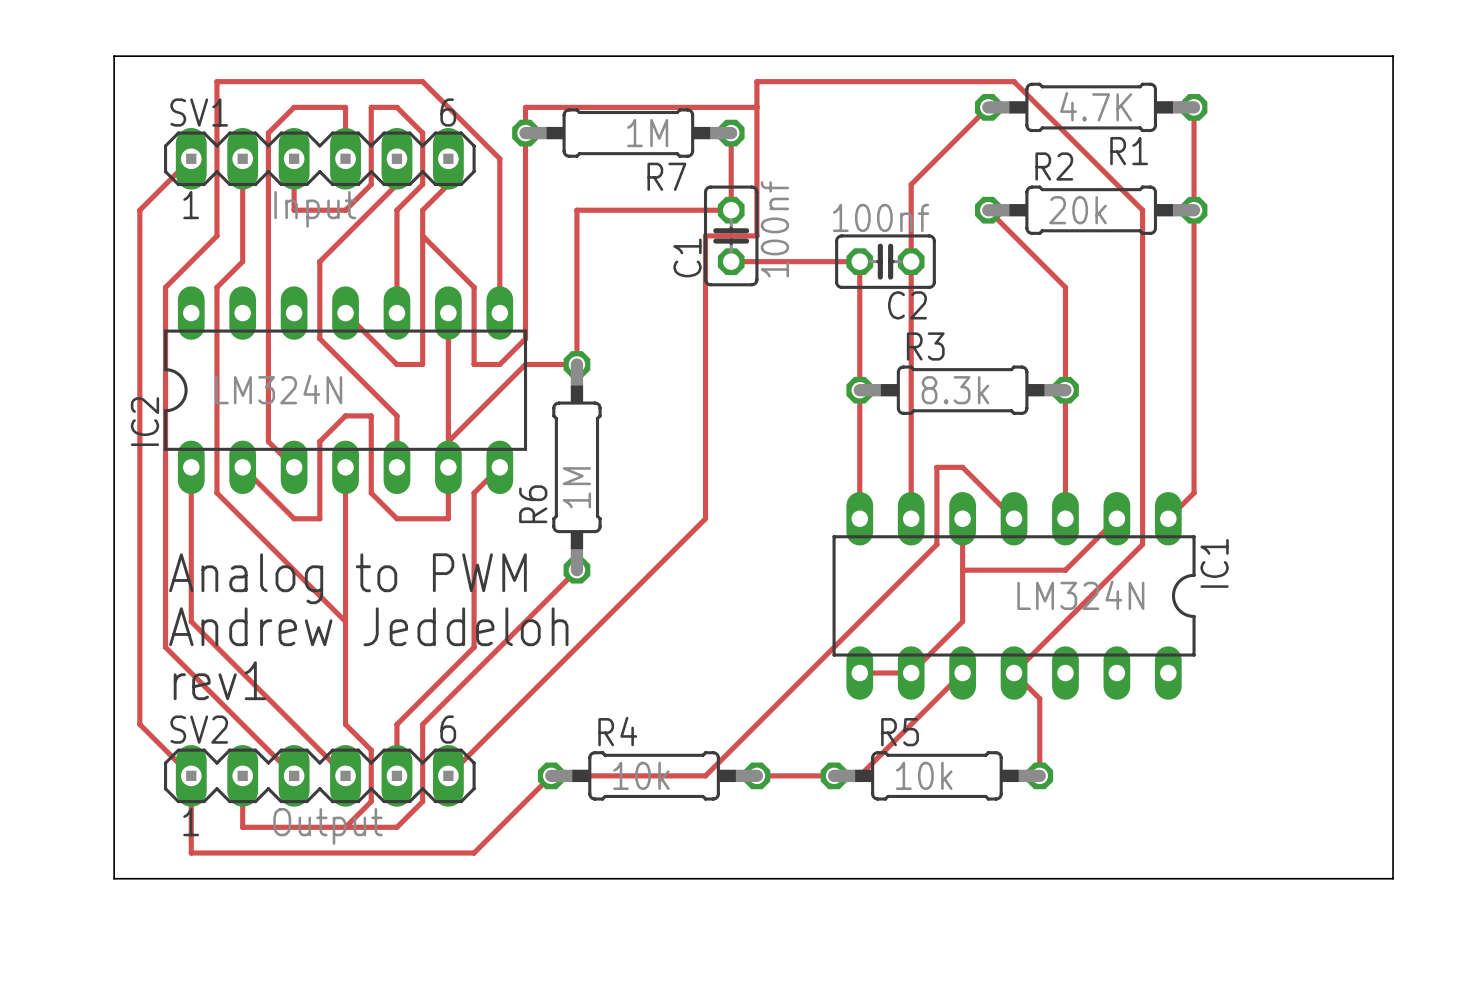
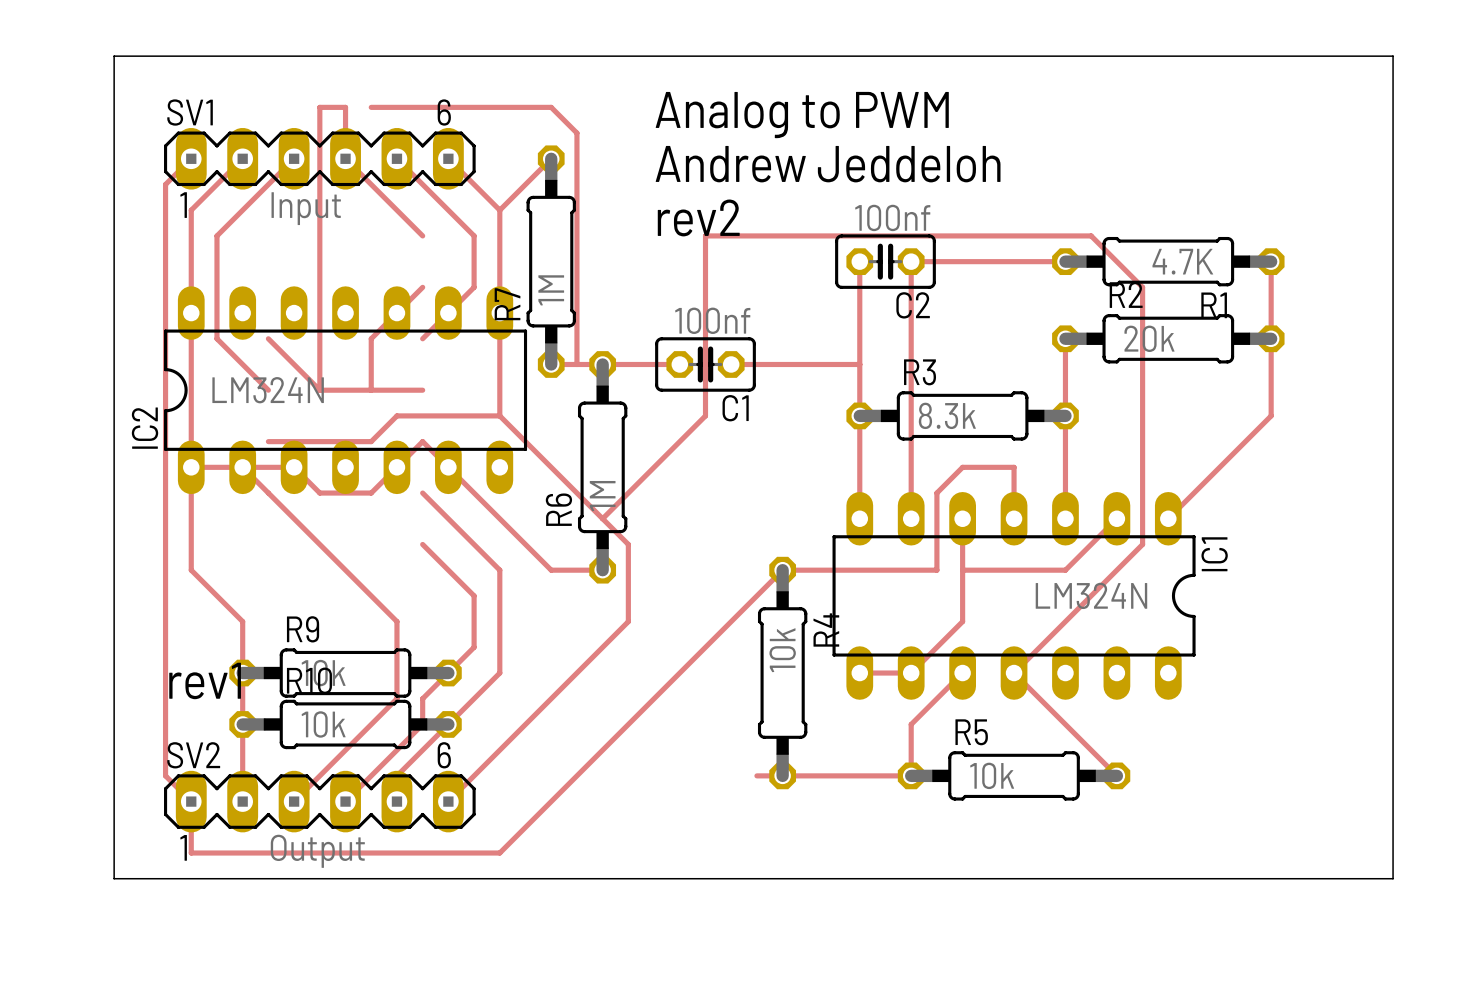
track: (319, 107) (294, 107) (268, 133) (268, 441) (294, 467) -> none
track: (371, 107) (371, 184) (345, 210) (294, 210) (294, 158) -> none
track: (396, 107) (422, 133) (422, 184) (396, 210) (396, 313) -> none
track: (525, 107) (525, 338) (499, 364) (474, 364) (474, 287) (422, 235) -> (525, 107) (396, 107)
track: (551, 107) (756, 107) -> none
track: (988, 107) (911, 184) (911, 261) -> (1065, 261) (911, 261)
R1 position: (1091, 107) -> (1168, 261)
track: (1194, 107) (1194, 493) -> (1271, 261) (1271, 415) (1194, 493)
text: none -> Analog to PWM (802, 115)
R7 rotation: 0° (628, 133) -> 90° clockwise (551, 261)
R7 position: (628, 133) -> (551, 261)
track: (731, 133) (731, 210) (576, 210) -> (551, 107) (576, 133) (576, 210)
track: (242, 158) (242, 261) (216, 287) -> (294, 158) (216, 235) (216, 287)
track: none -> (242, 158) (191, 210) (191, 467) (294, 467) (319, 493) (371, 493) (422, 441) (551, 570) (602, 570)
track: none -> (345, 158) (422, 235)
track: (396, 158) (396, 184) (319, 261) -> (319, 107) (319, 261)
track: none -> (396, 158) (474, 235) (474, 287) (422, 338)
track: (448, 158) (448, 184) (422, 210) (422, 364) (396, 364) (345, 313) -> (448, 158) (499, 210) (551, 158)
text: none -> Andrew Jeddeloh (828, 164)
track: (165, 184) (139, 210) (139, 724) (191, 775) (191, 801) -> none
track: (499, 210) (499, 158) (422, 81) (216, 81) (216, 235) (165, 287) -> (165, 184) (165, 287)
track: (988, 210) (1065, 287) (1065, 338) -> none
R2 position: (1091, 210) -> (1168, 338)
text: none -> rev2 (698, 217)
C1 value position: 100nf (774, 229) -> 100nf (712, 320)
C1 rotation: 0° (731, 235) -> 90° clockwise (705, 364)
C1 position: (731, 235) -> (705, 364)
track: (756, 235) (756, 81) (1014, 81) (1142, 210) (1142, 287) -> (756, 235) (1091, 235) (1142, 287)
C1 name position: C1 (687, 257) -> C1 (735, 408)
track: (731, 261) (859, 261) -> (731, 364) (859, 364)
track: none -> (422, 287) (371, 338) (371, 390)
track: (448, 313) (448, 518) (396, 518) (371, 493) (371, 415) (345, 415) (319, 441) (319, 518) (294, 518) -> (294, 801) (396, 698) (396, 621) (294, 518)
track: none -> (499, 313) (499, 415)
track: (216, 338) (216, 493) (345, 621) -> (216, 338) (268, 390)
track: none -> (268, 338) (319, 390)
track: (319, 338) (396, 415) (396, 467) -> (319, 338) (319, 390)
track: (551, 364) (525, 364) (448, 441) -> none
track: none -> (576, 364) (679, 364)
track: none -> (319, 390) (422, 390)
R3 position: (962, 390) -> (962, 415)
track: none -> (499, 415) (396, 415) (371, 441) (268, 441)
track: none -> (499, 415) (628, 544) (628, 621) (448, 801)
track: (705, 415) (705, 518) (448, 775) -> (705, 415) (602, 518)
track: (345, 467) (345, 724) (371, 750) (371, 801) (345, 827) -> none
track: (499, 467) (474, 493) (474, 595) -> (422, 544) (474, 595)
R6 position: (576, 467) -> (602, 467)
track: none -> (422, 493) (499, 570) (499, 673) (396, 775) (396, 801)
track: (936, 493) (936, 467) (962, 467) (1014, 518) -> (936, 493) (962, 467) (1014, 467) (1014, 518)
track: (936, 544) (705, 775) (551, 775) (474, 853) -> (936, 544) (936, 570) (782, 570) (499, 853) (474, 853)
track: (191, 570) (191, 621) (345, 775) -> (191, 570) (242, 621) (242, 775)
track: (576, 570) (422, 724) (422, 801) (396, 827) (242, 827) (242, 801) -> none
text: Analog to PWM (347, 578) -> none
text: Andrew Jeddeloh (368, 626) -> none
track: (165, 647) (294, 775) -> (165, 647) (165, 775) (191, 801)
R9: none -> 10k (345, 673)
track: (422, 698) (396, 724) (396, 775) -> (422, 698) (422, 724) (345, 801)
track: (1039, 698) (1039, 775) -> (1039, 698) (1116, 775)
R10: none -> 10k (345, 724)
track: (911, 724) (859, 775) -> (911, 724) (911, 775) (859, 775)
SV2 position: (319, 775) -> (319, 801)
R4 rotation: 0° (654, 775) -> 90° clockwise (782, 673)
R4 position: (654, 775) -> (782, 673)
R5 position: (936, 775) -> (1014, 775)

